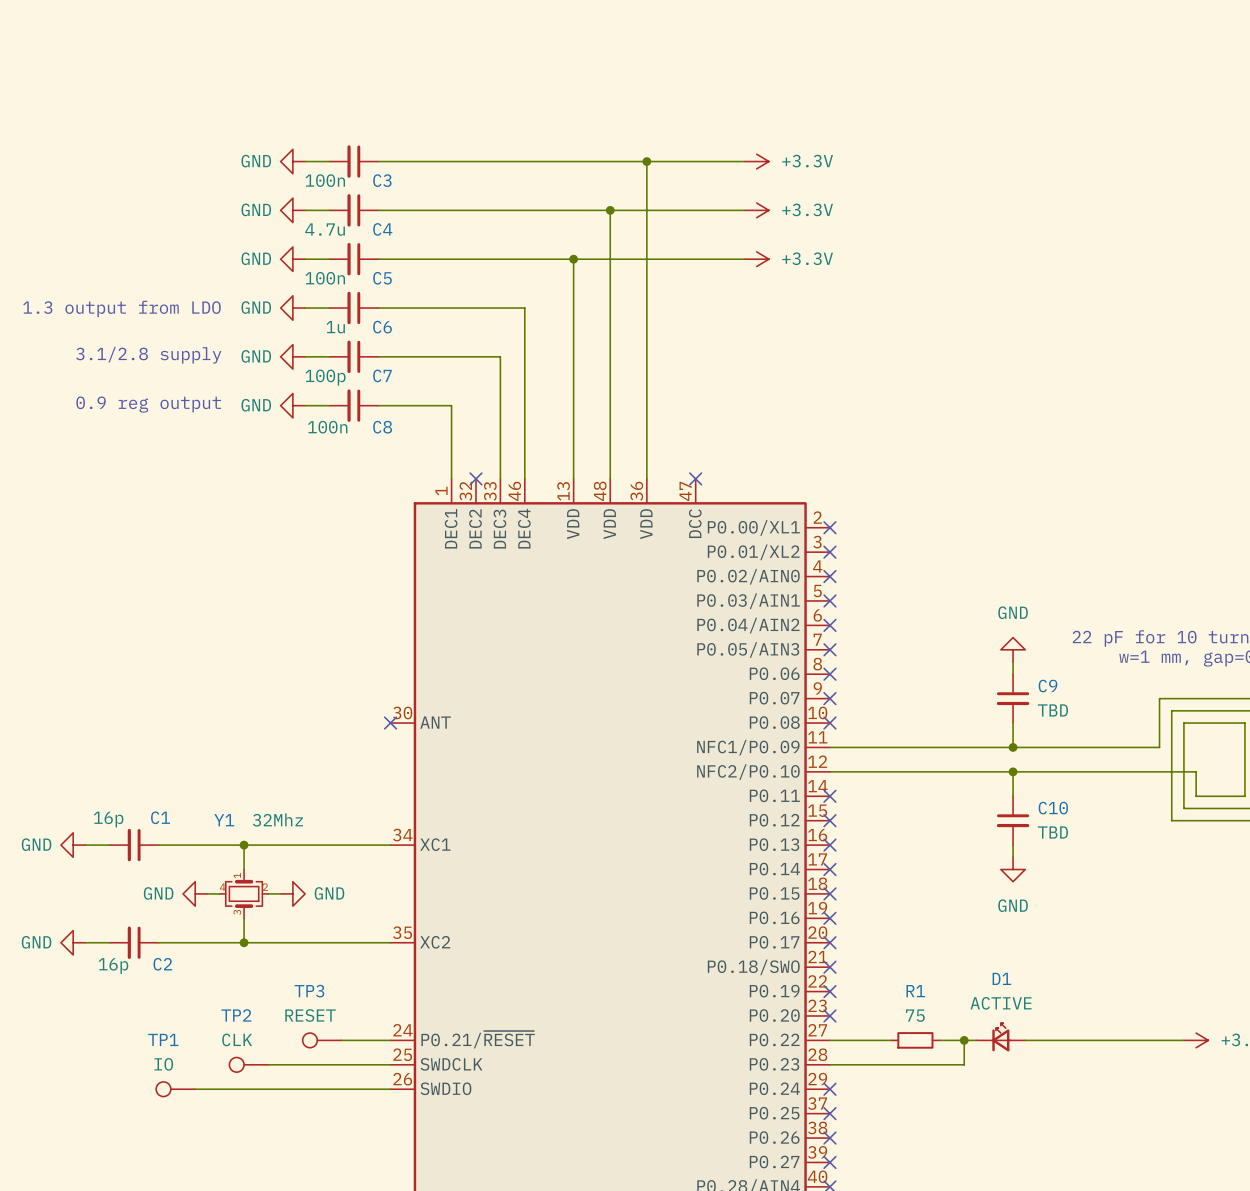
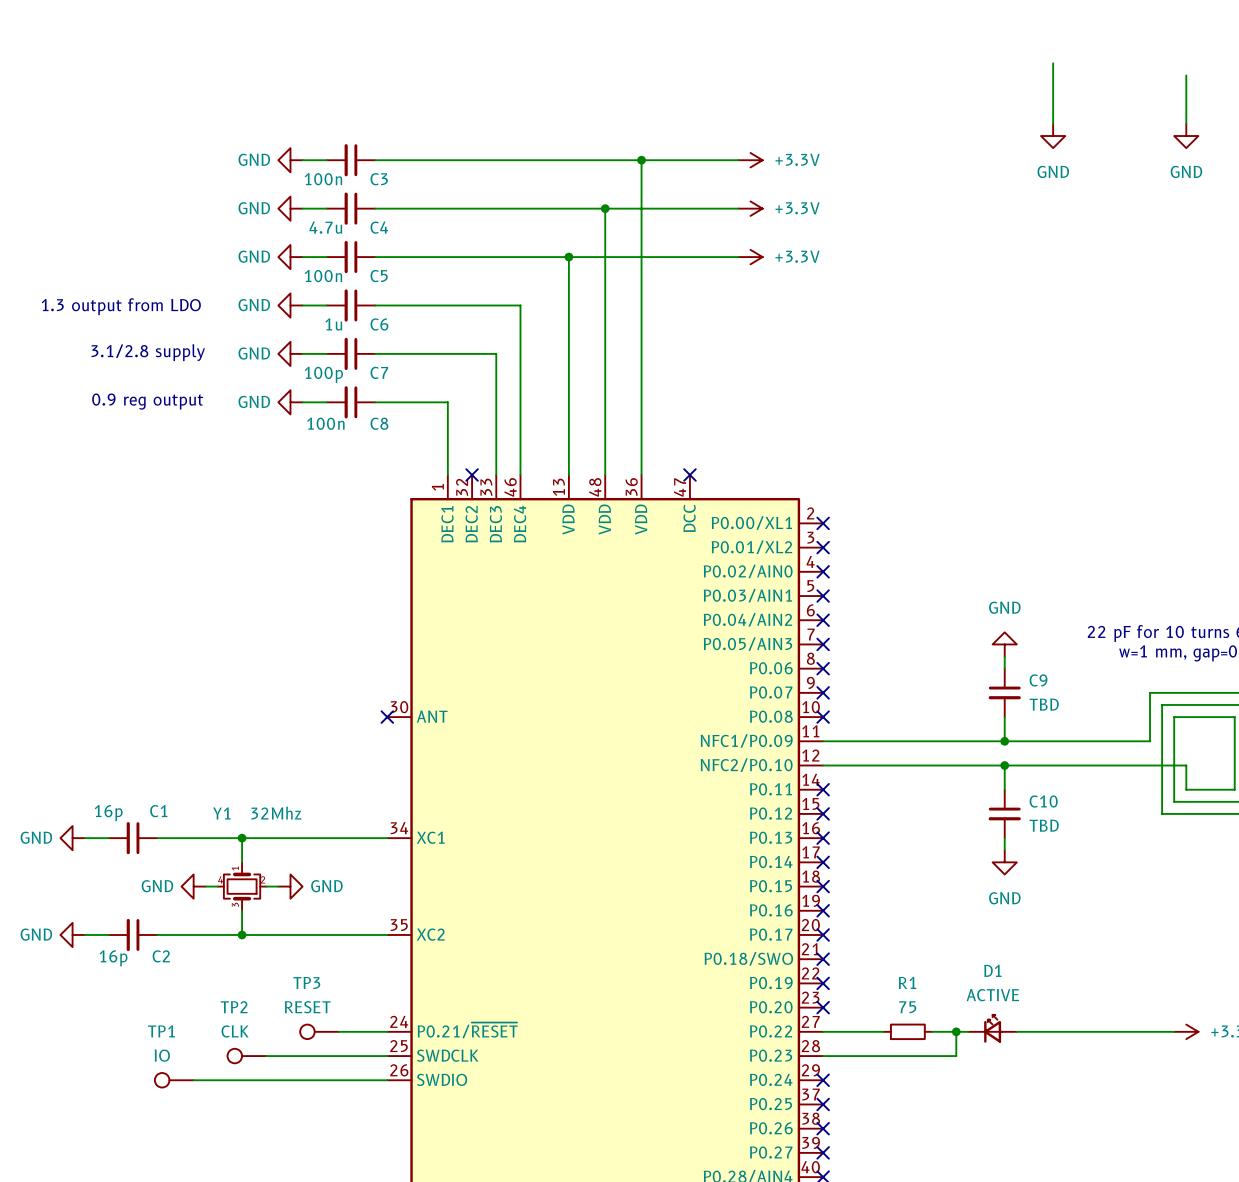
wire: none -> (1053, 63) (1053, 123)
wire: none -> (1186, 75) (1186, 123)
power symbol: none -> GND (1053, 136)
power symbol: none -> GND (1186, 136)

